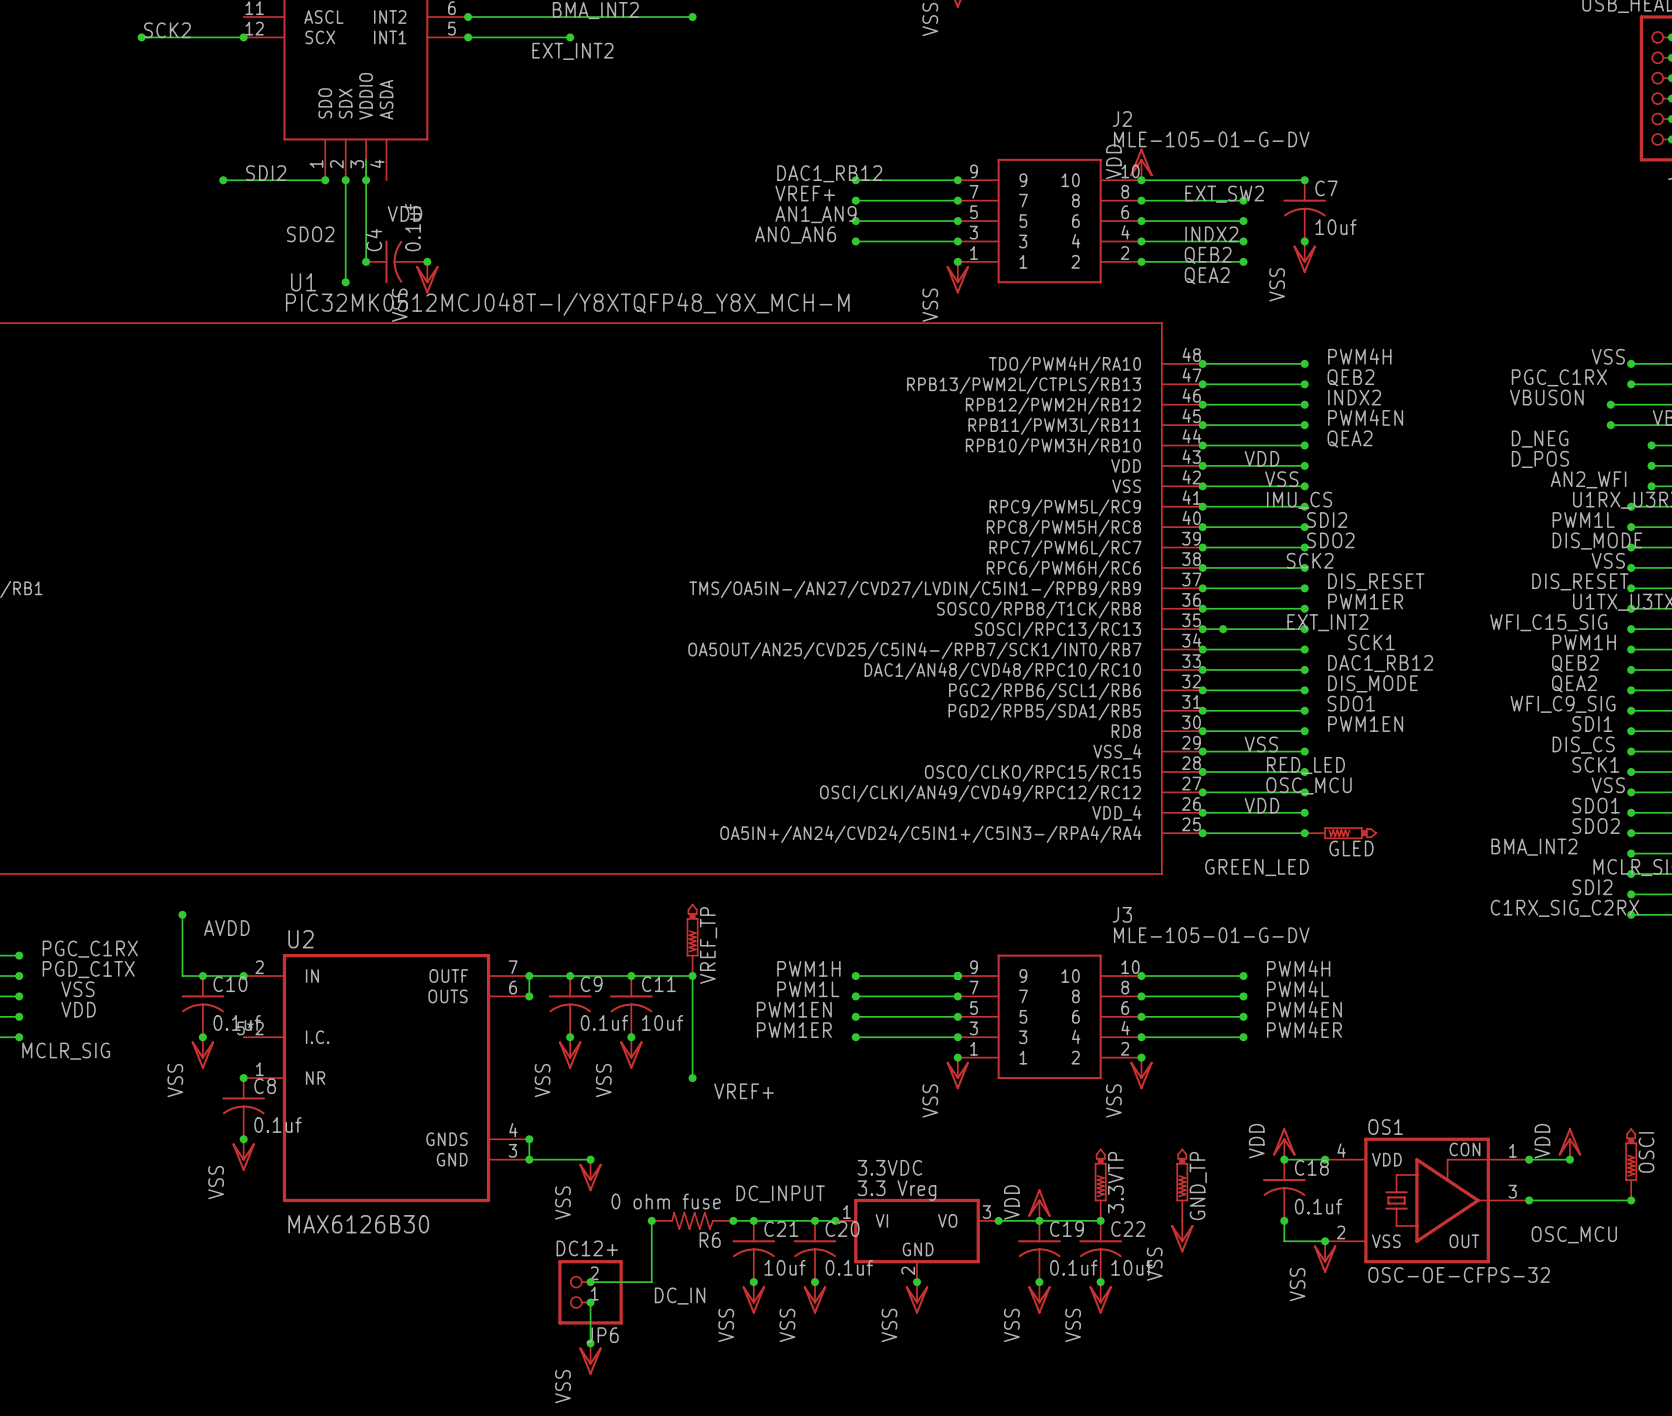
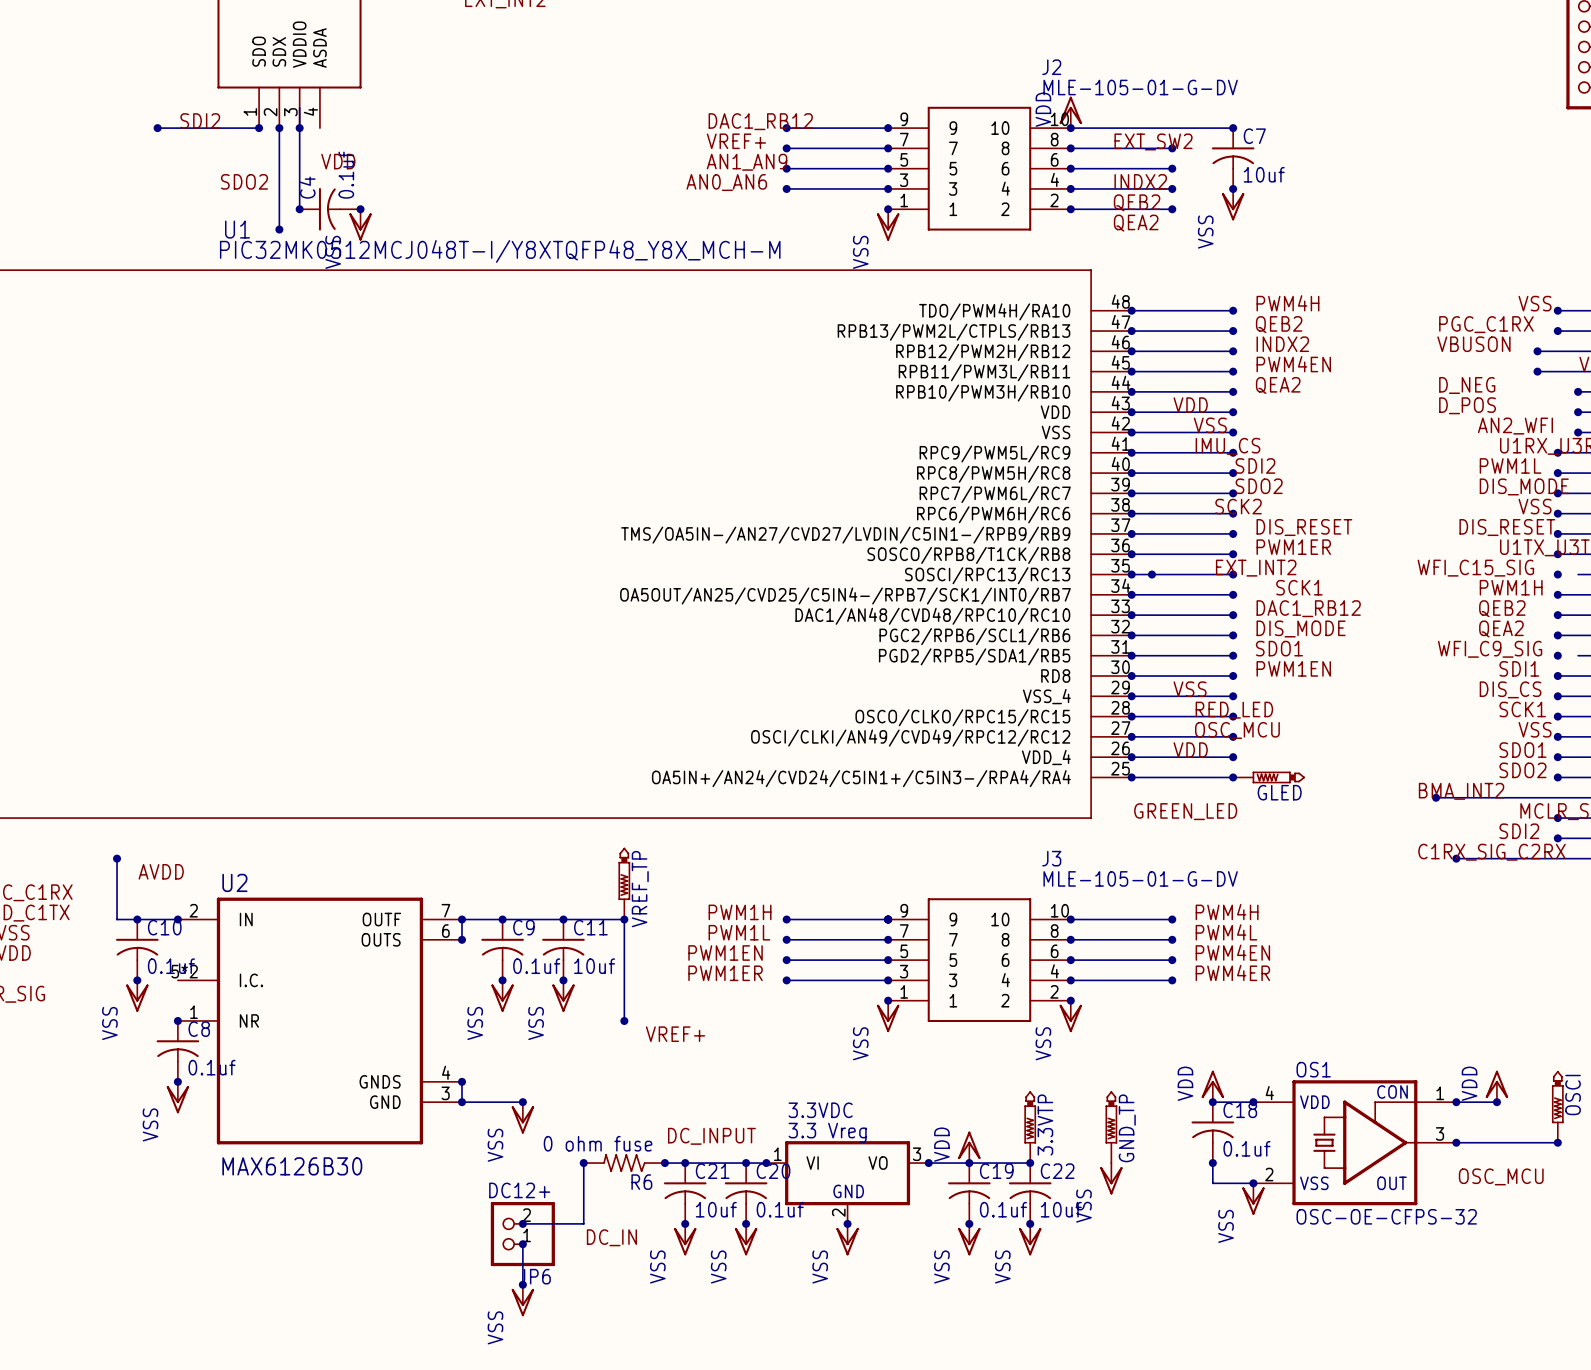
wire: (1631, 629) (1651, 629) -> none
wire: (1631, 710) (1651, 710) -> none
wire: none -> (1436, 797) (1557, 797)
junction: none -> (1436, 797)
junction: (1631, 853) -> none
wire: none -> (1456, 858) (1557, 858)
junction: none -> (1456, 858)
junction: (1631, 914) -> none

